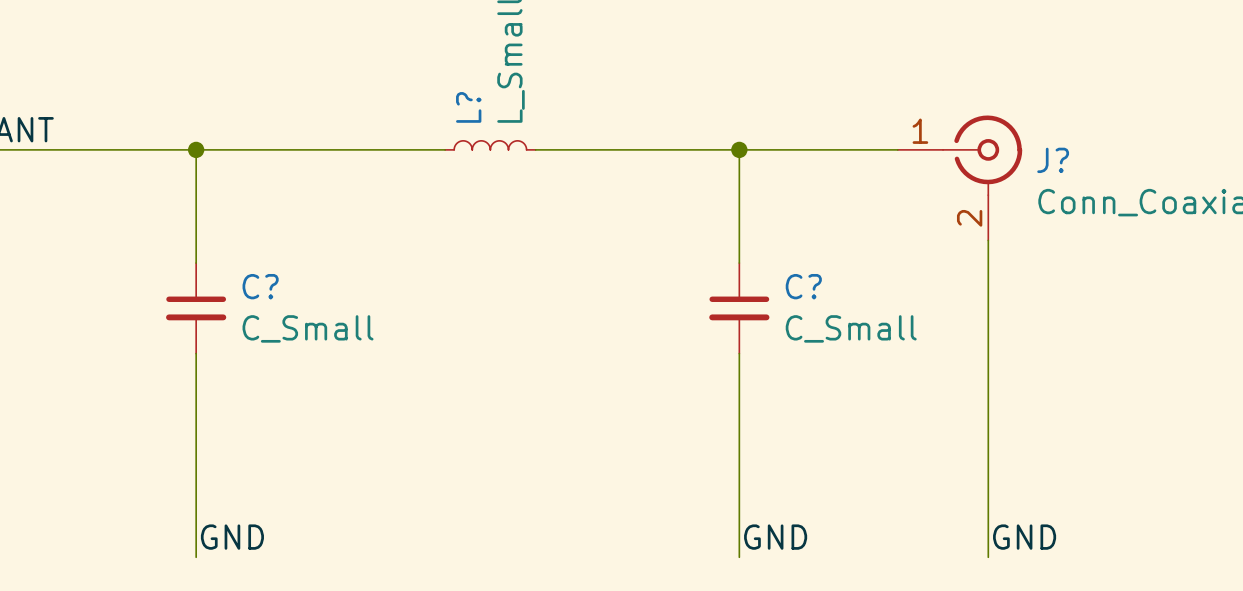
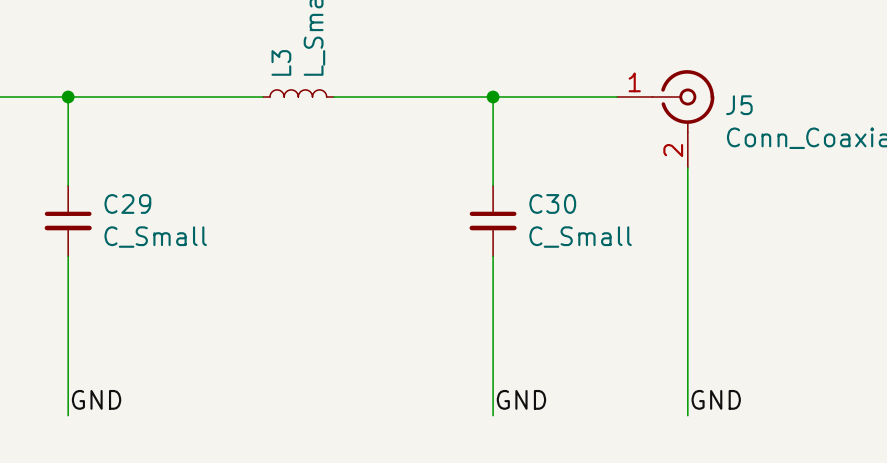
L? name: L? (468, 107) -> L3 (281, 62)
J? name: J? (1053, 160) -> J5 (739, 105)
C? name: C? (260, 286) -> C29 (127, 203)
C? name: C? (803, 286) -> C30 (552, 203)

